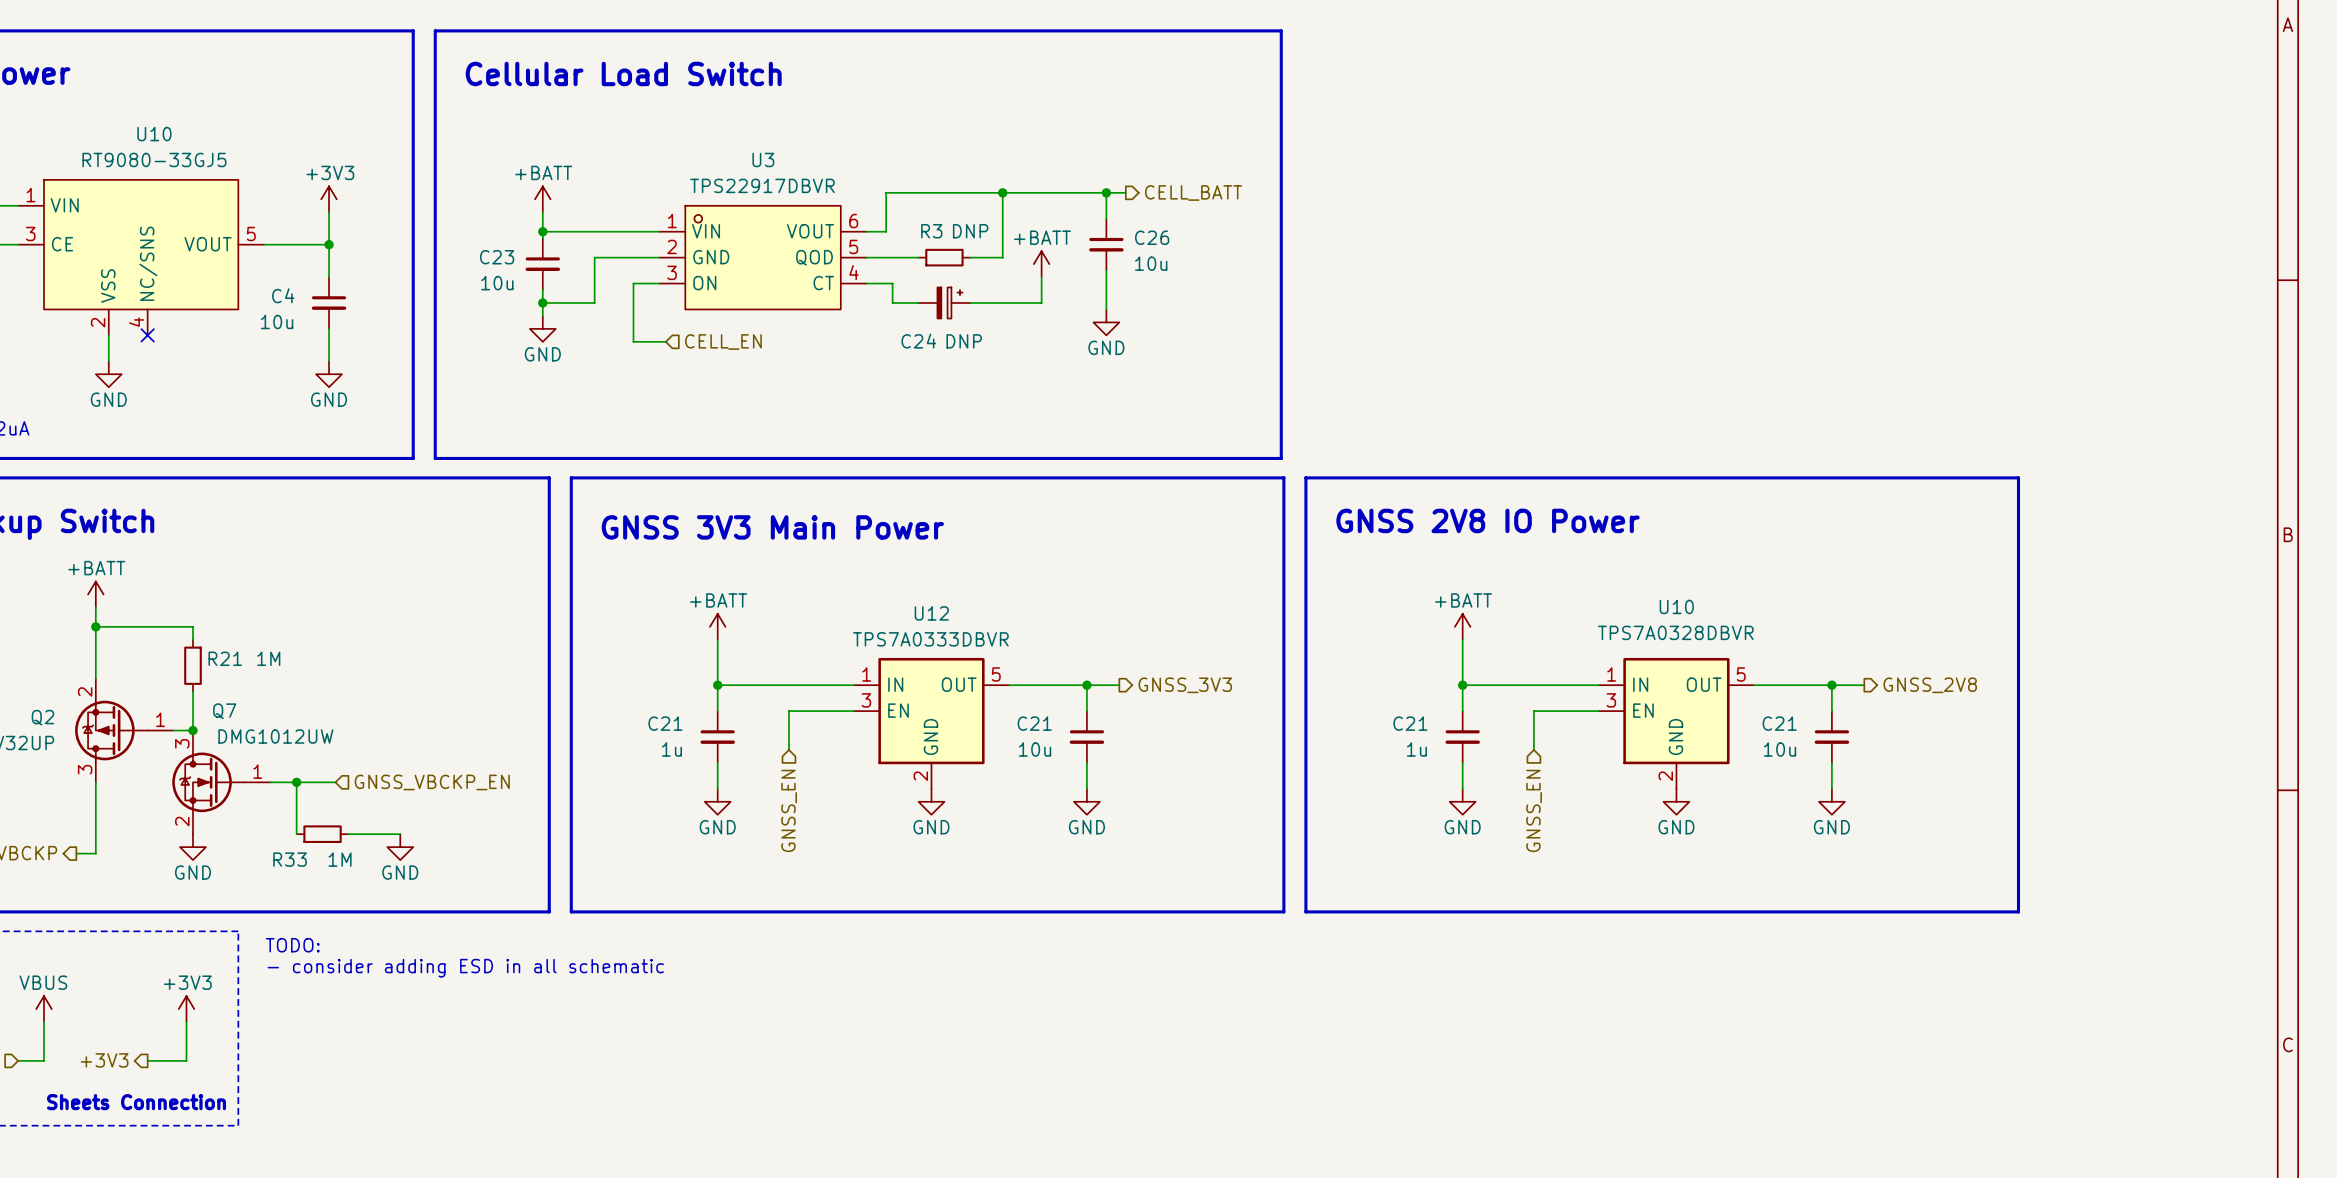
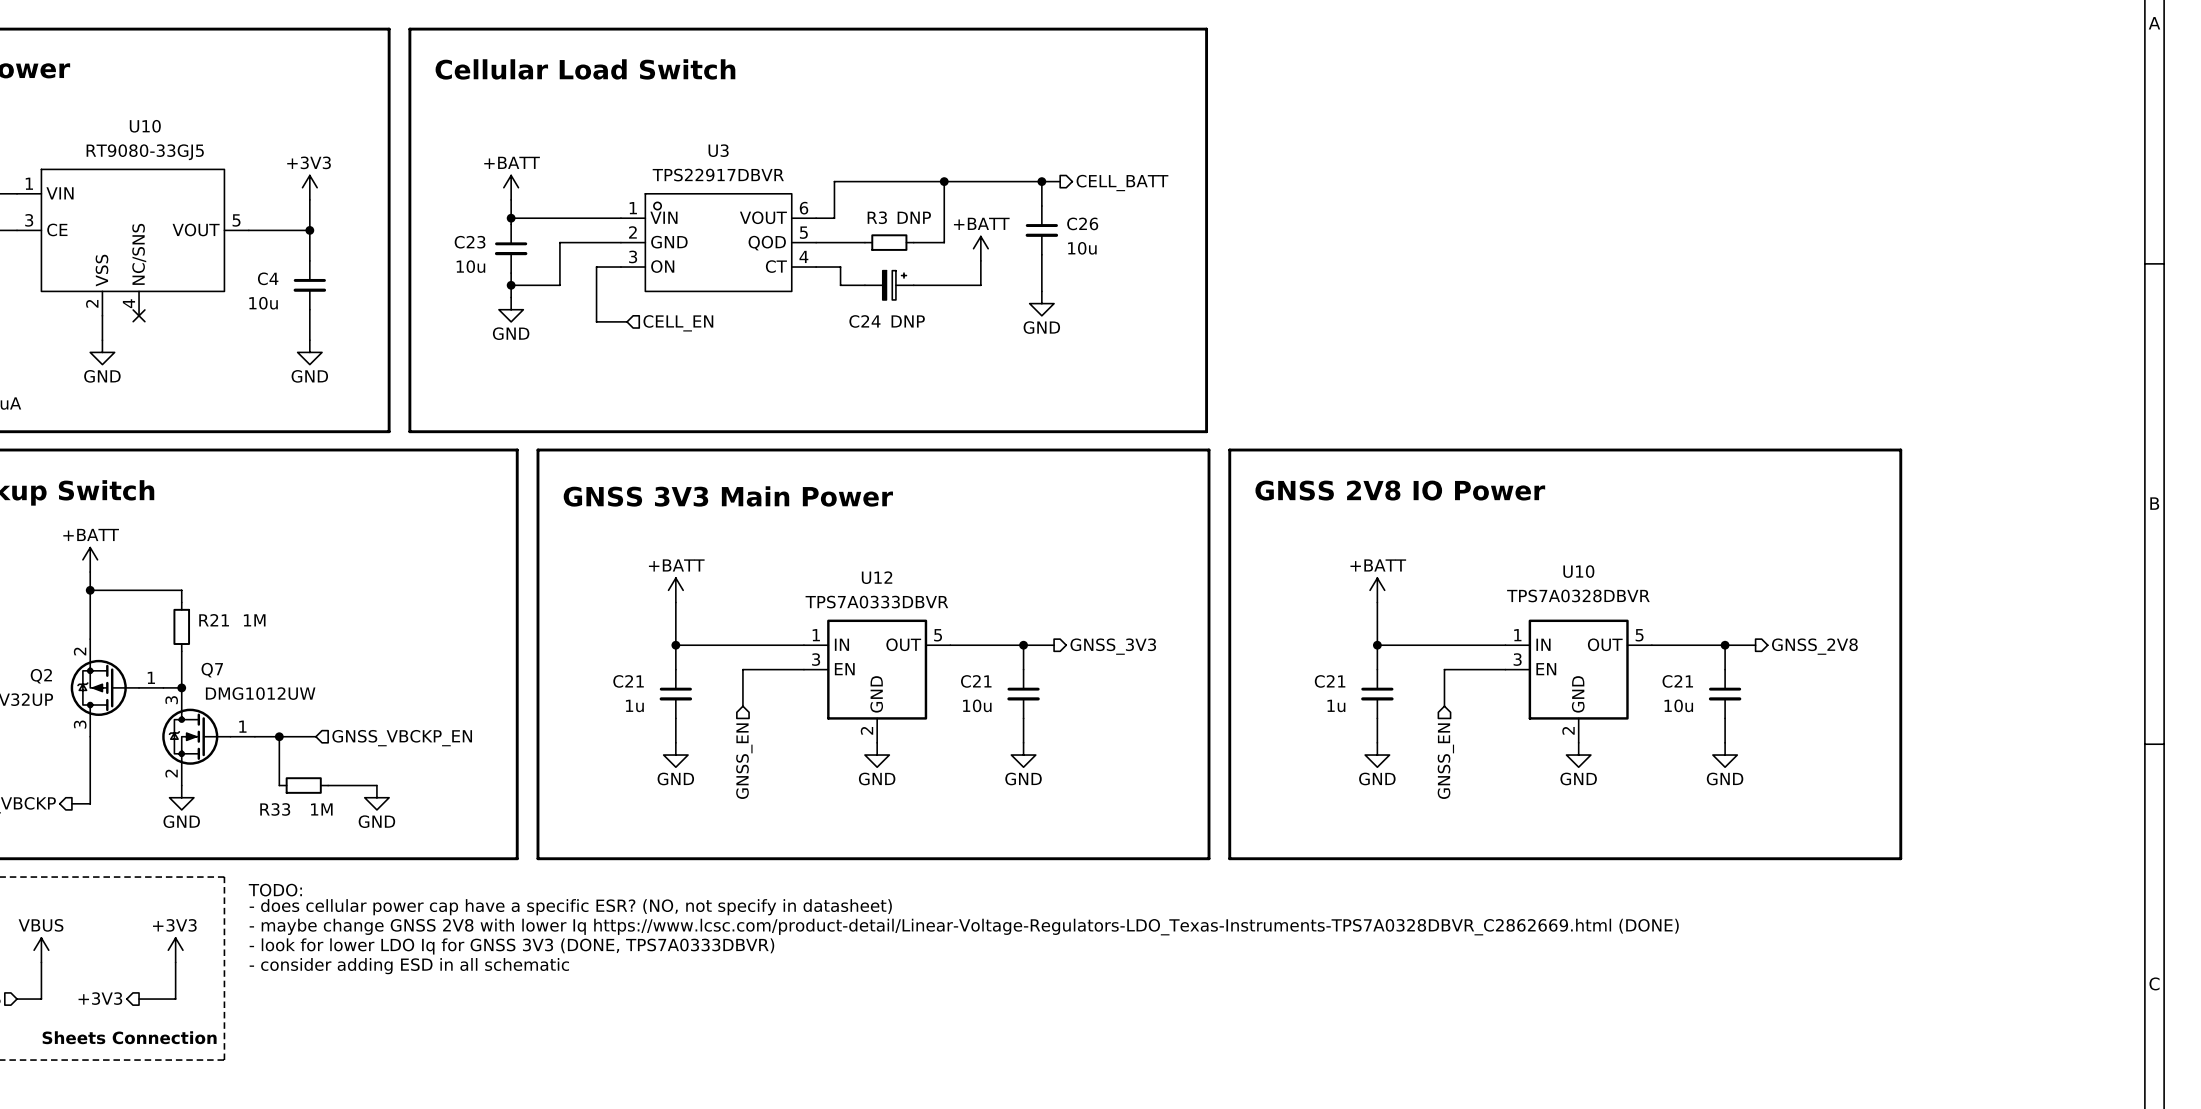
text: none -> - does cellular power cap have a specific ESR? (NO, not specify in datasheet) (570, 907)
text position: - consider adding ESD in all schematic (465, 968) -> - consider adding ESD in all schematic (409, 966)
text: none -> - maybe change GNSS 2V8 with lower Iq https://www.lcsc.com/product-detail/Linear-Voltage-Regulators-LDO_Texas-Instruments-TPS7A0328DBVR_C2862669.html (DONE) (964, 927)
text: none -> - look for lower LDO Iq for GNSS 3V3 (DONE, TPS7A0333DBVR) (511, 946)

